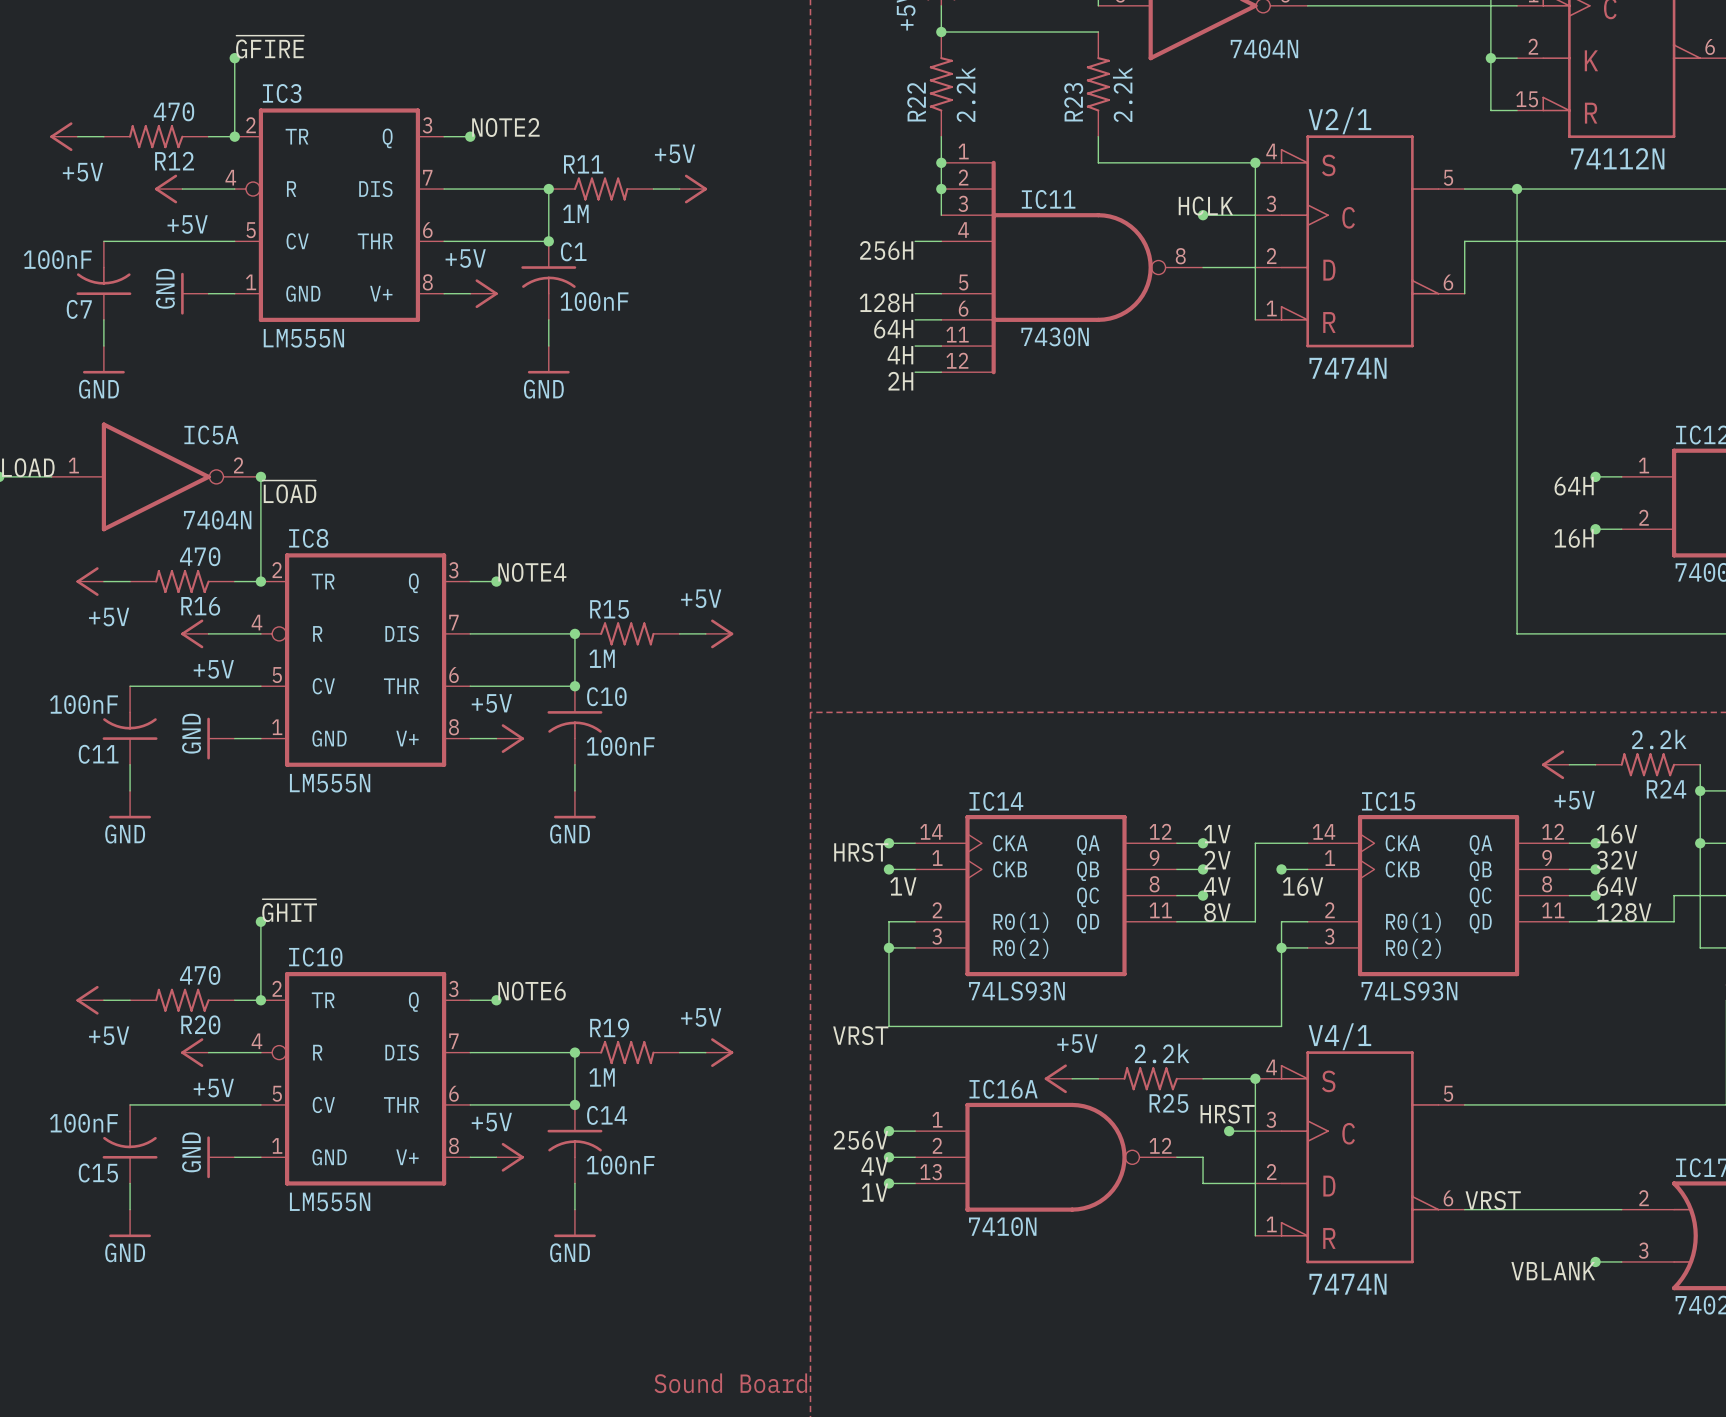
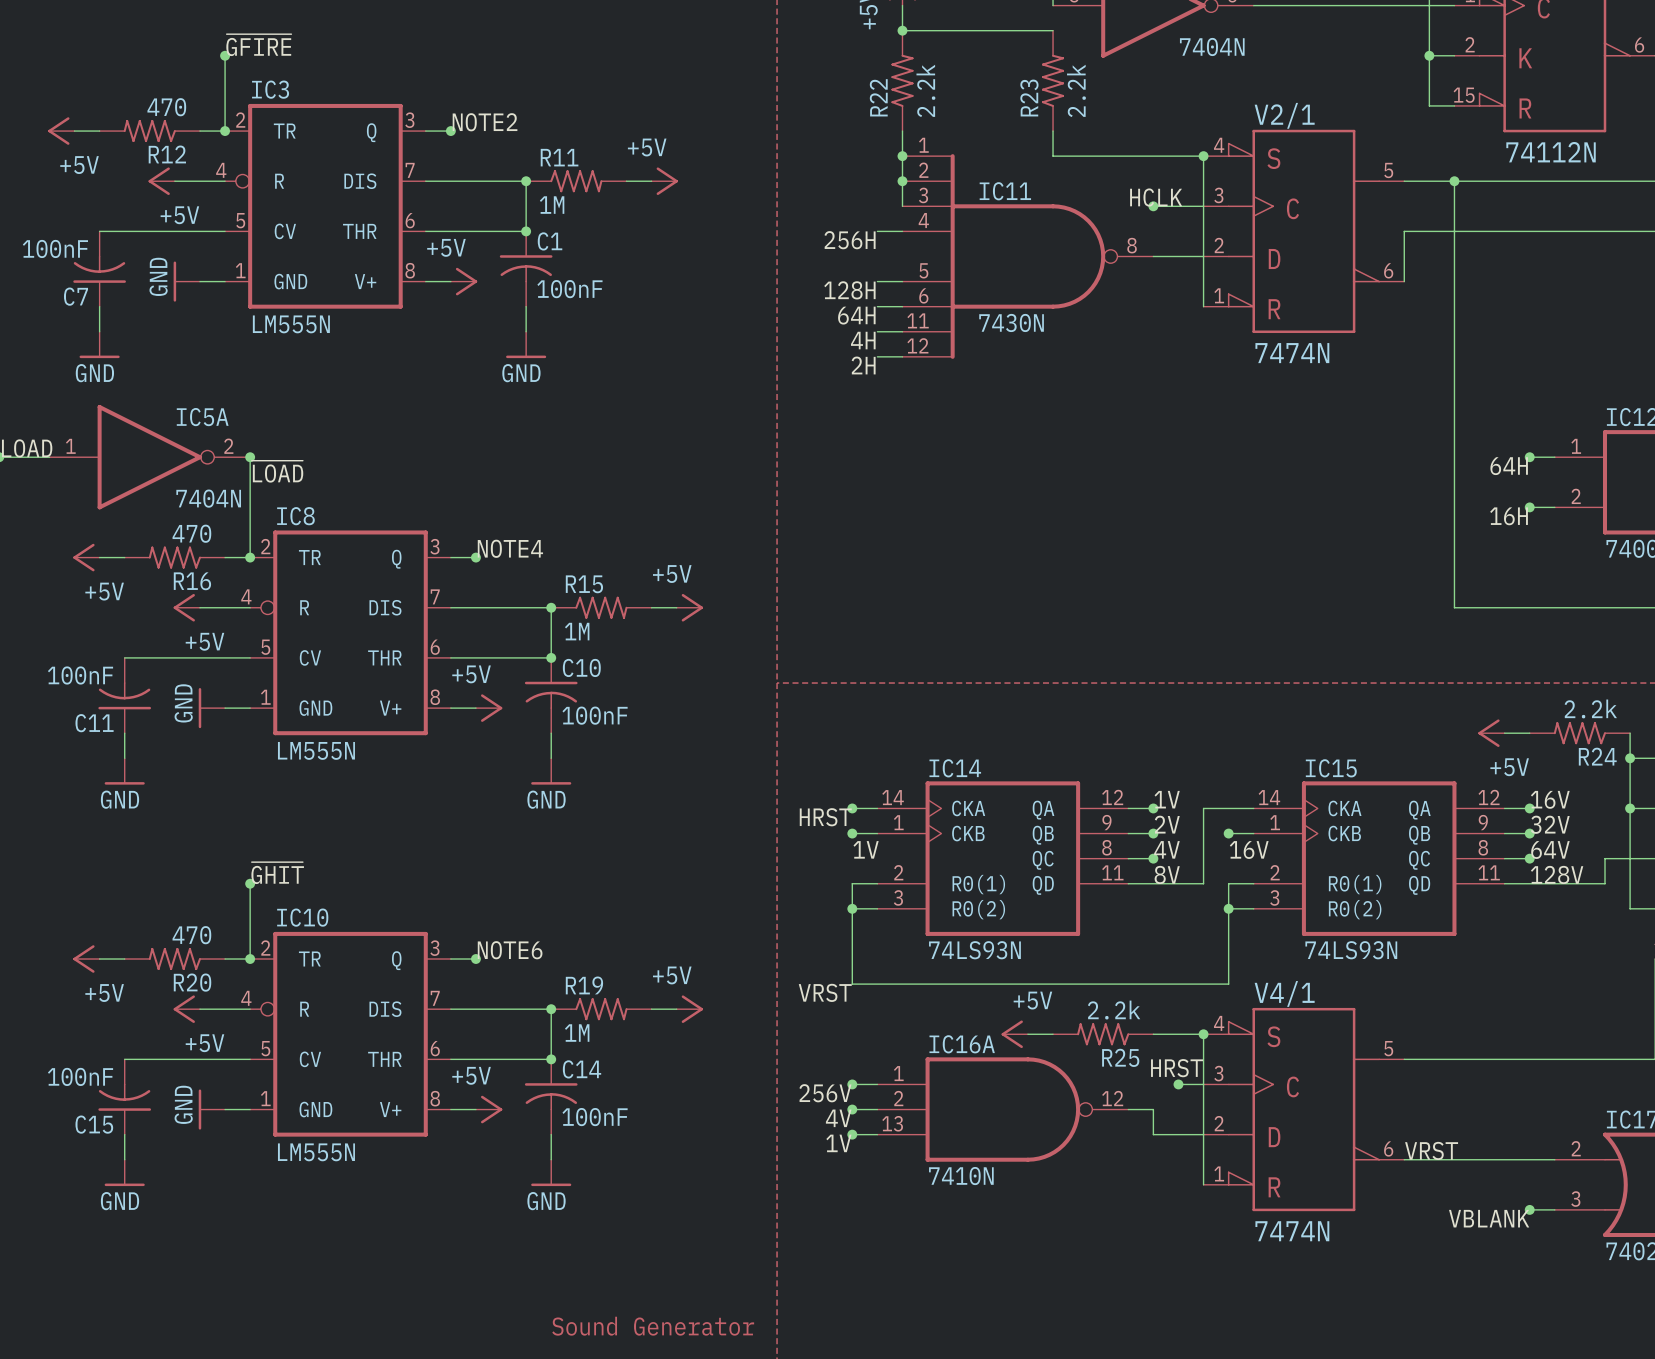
text: Sound Board (730, 1383) -> Sound Generator (653, 1326)

